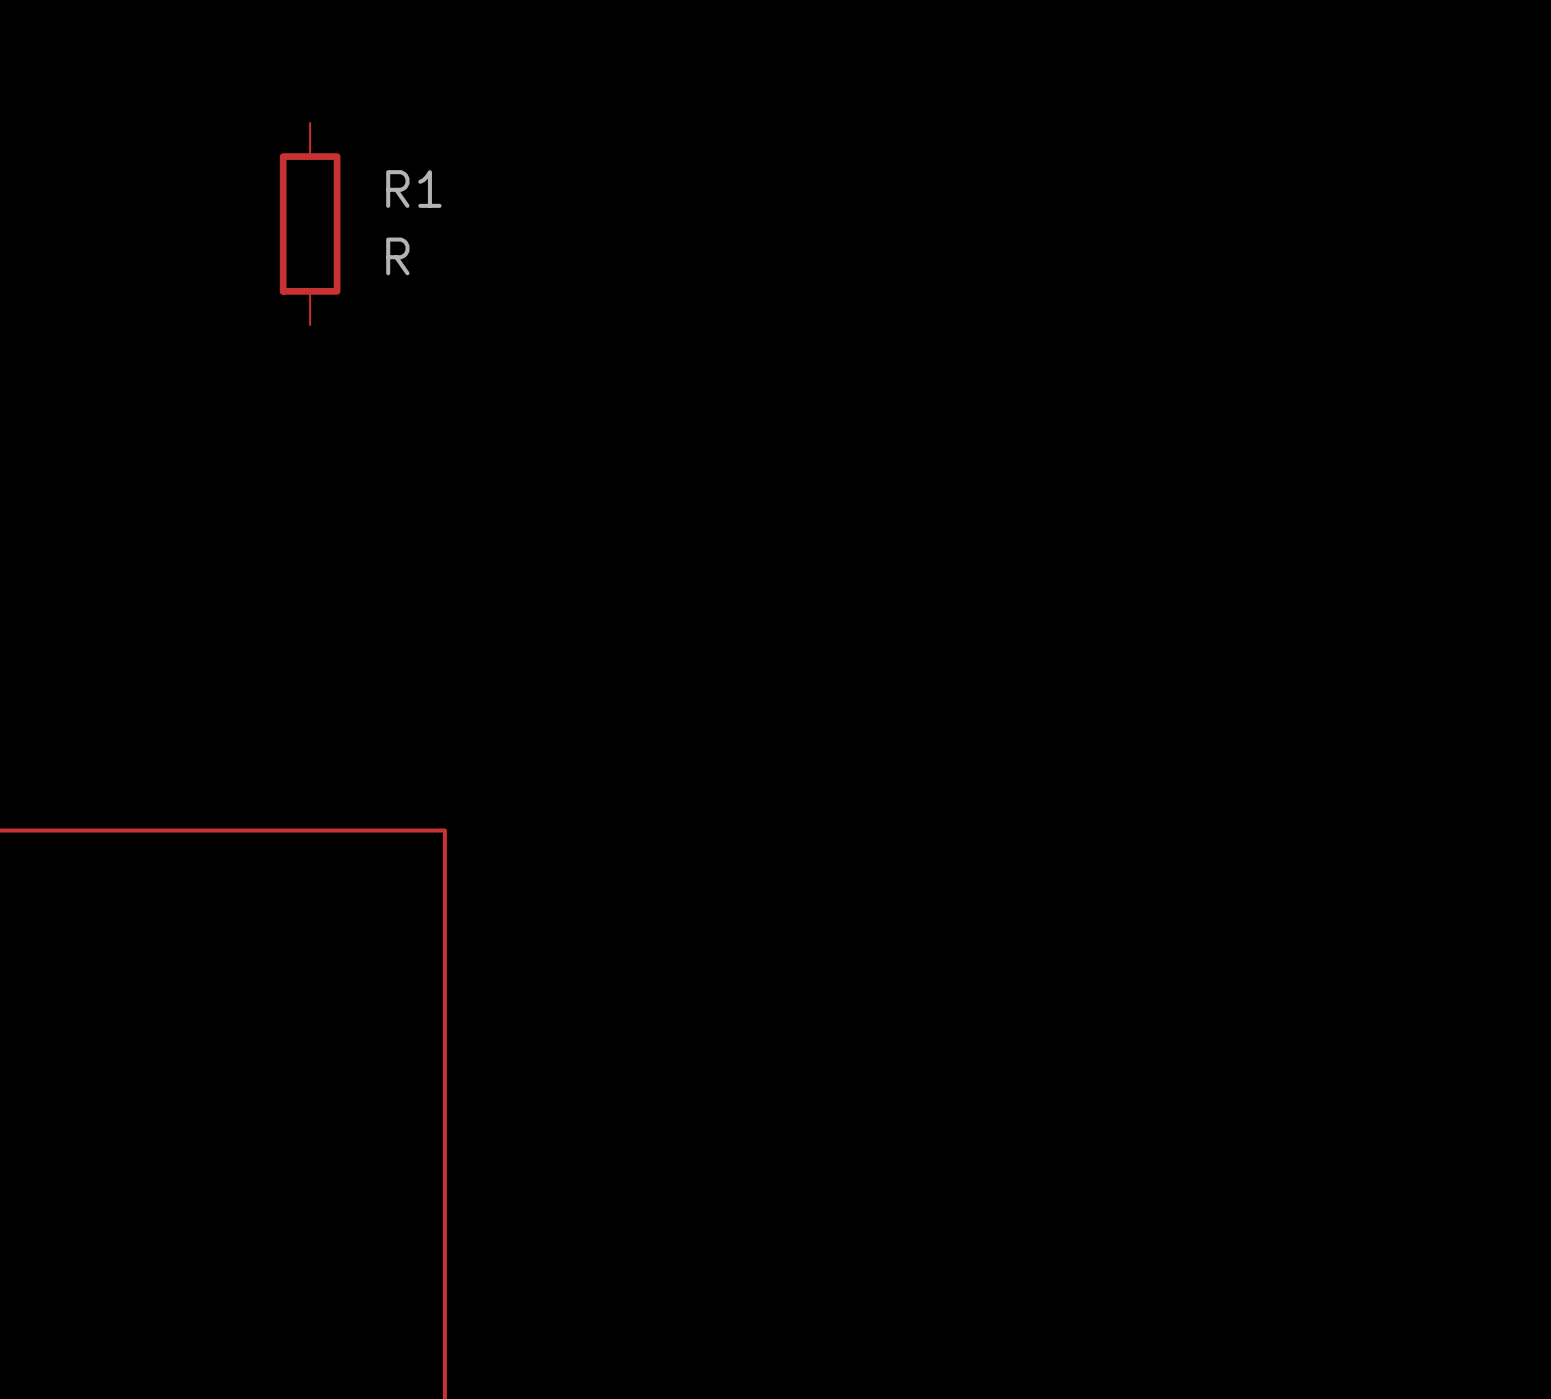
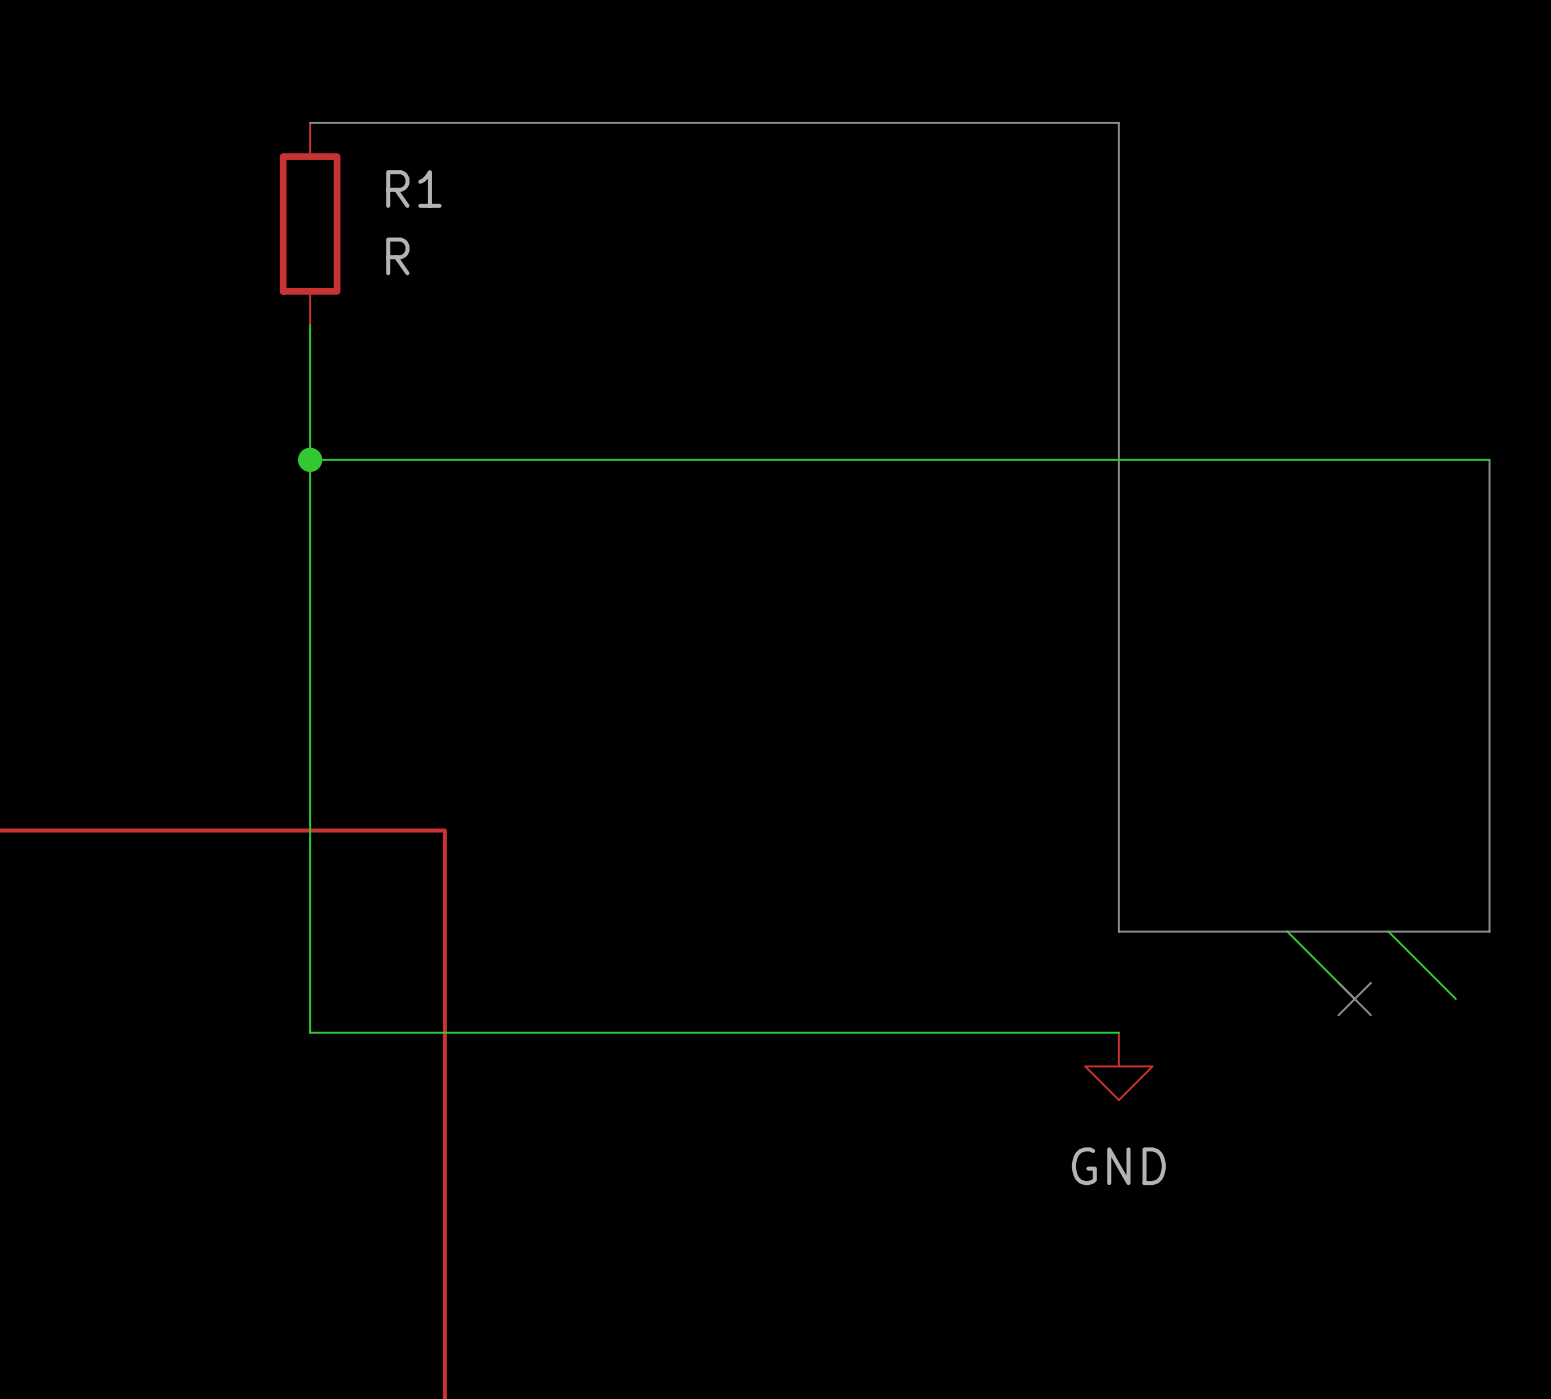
bus: none -> (310, 122) (1118, 122) (1118, 931) (1489, 931) (1489, 459)
wire: none -> (310, 325) (310, 1032) (1118, 1032)
wire: none -> (310, 459) (1489, 459)
junction: none -> (310, 459)
wire: none -> (1287, 931) (1354, 999)
wire: none -> (1388, 931) (1455, 999)
no-connect mark: none -> (1354, 999)
power symbol: none -> GND (1118, 1066)

